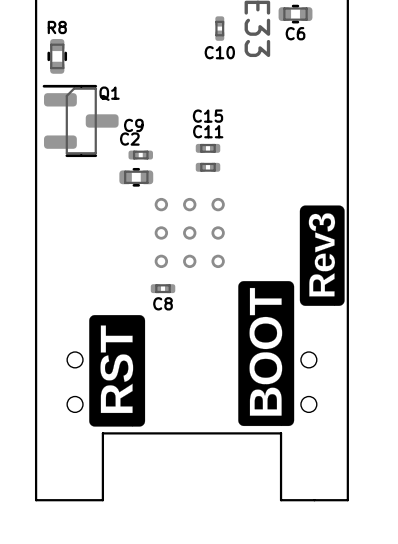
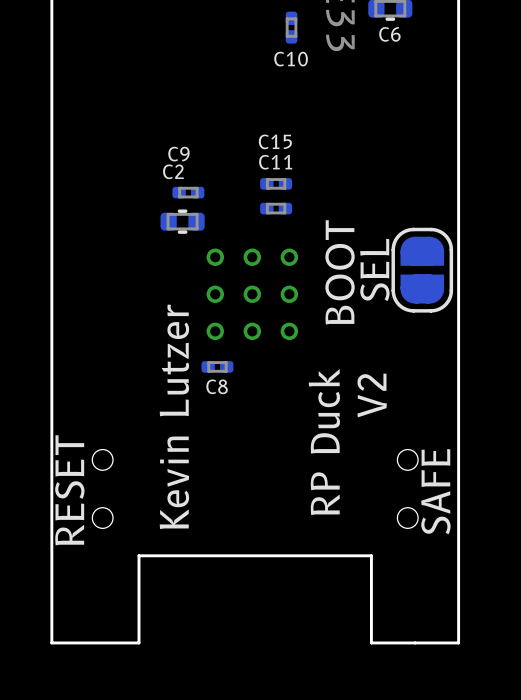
R8: (57, 56) -> none
Q1: (80, 120) -> none
drawing: [238, 205, 345, 427] -> none
text: none -> SEL (374, 269)
part: none -> (422, 270)
text: none -> BOOT (340, 272)
text: none -> V2 (372, 395)
drawing: [89, 315, 146, 427] -> none
text: none -> Kevin Lutzer (174, 416)
text: none -> RP Duck (324, 442)
text: none -> RESET (69, 490)
text: none -> SAFE (435, 491)

